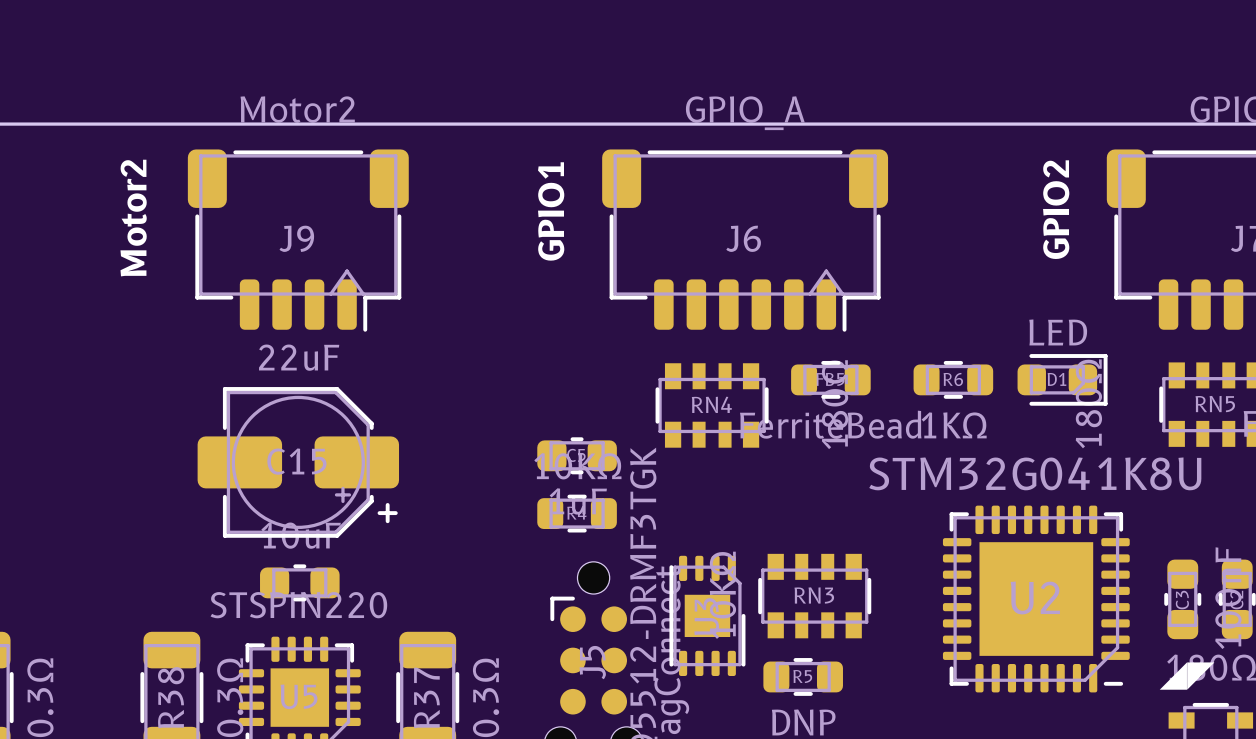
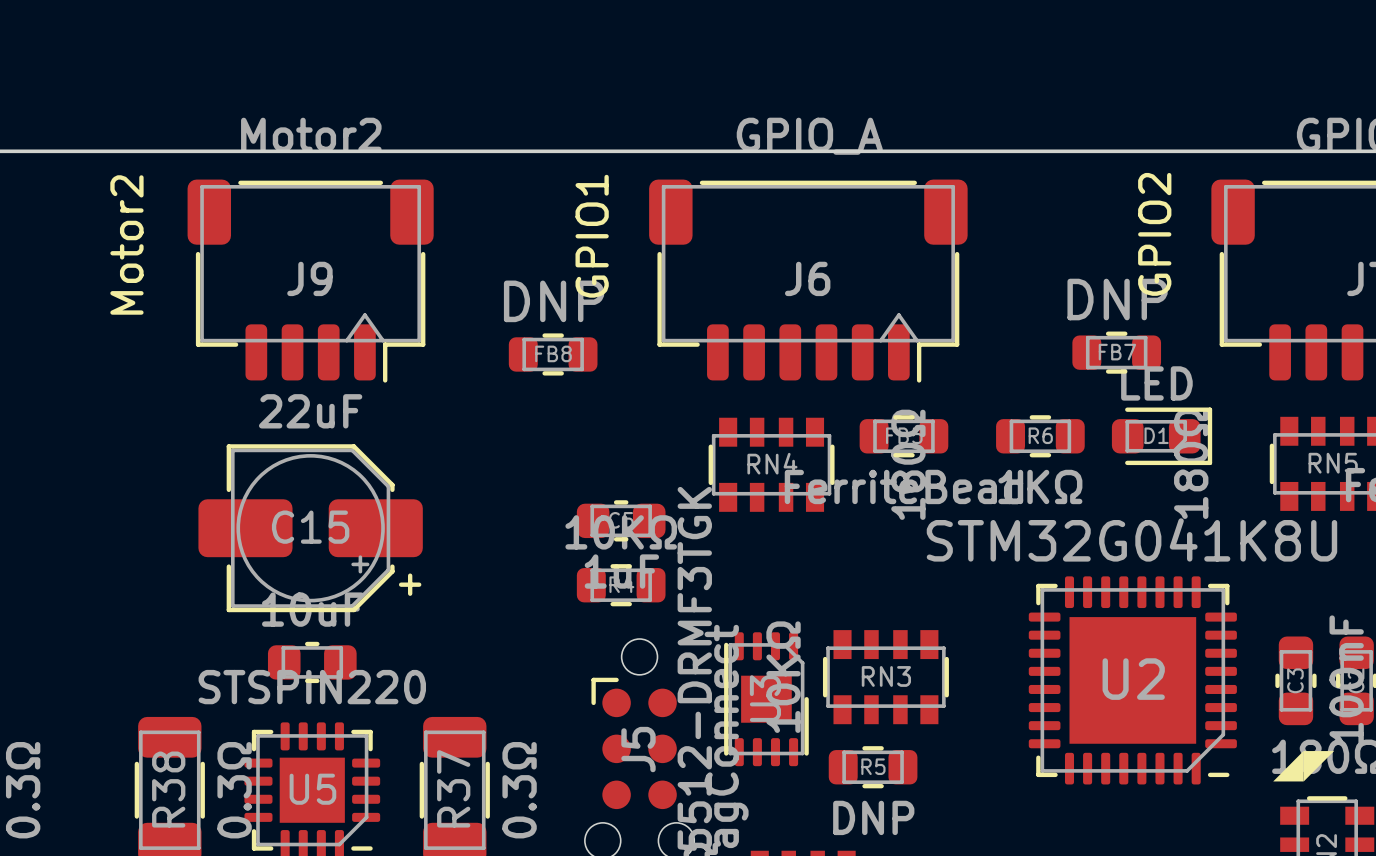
FB7: none -> DNP (1116, 352)
FB8: none -> DNP (553, 354)

